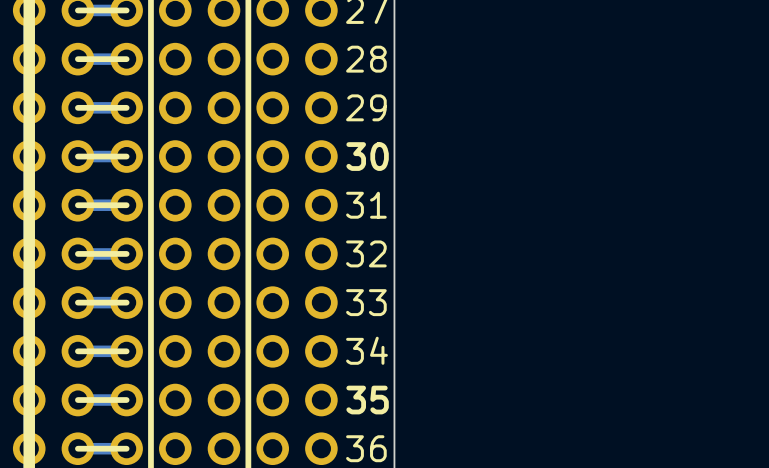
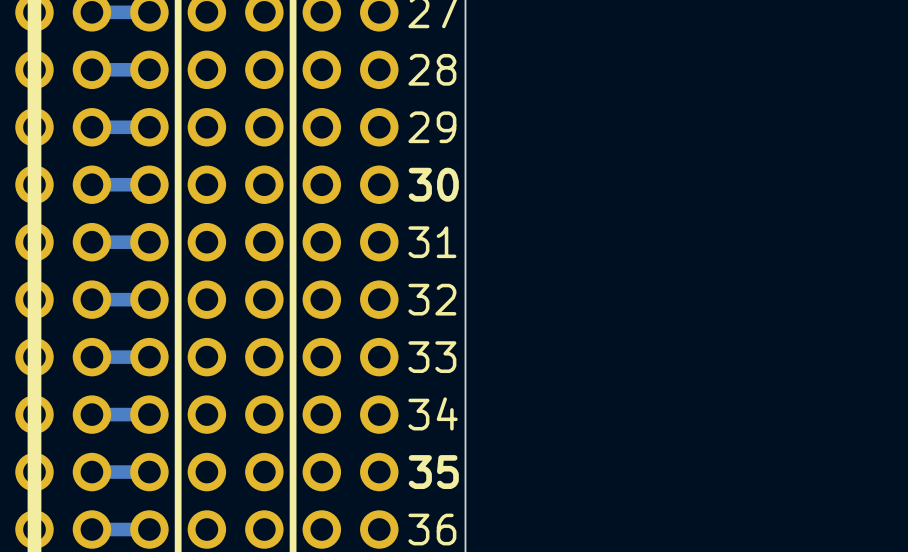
line: (126, 10) (77, 10) -> none
line: (126, 59) (77, 59) -> none
line: (126, 107) (77, 107) -> none
line: (126, 156) (77, 156) -> none
line: (126, 205) (77, 205) -> none
line: (126, 253) (77, 253) -> none
line: (126, 302) (77, 302) -> none
line: (126, 351) (77, 351) -> none
line: (126, 400) (77, 400) -> none
line: (126, 448) (77, 448) -> none

